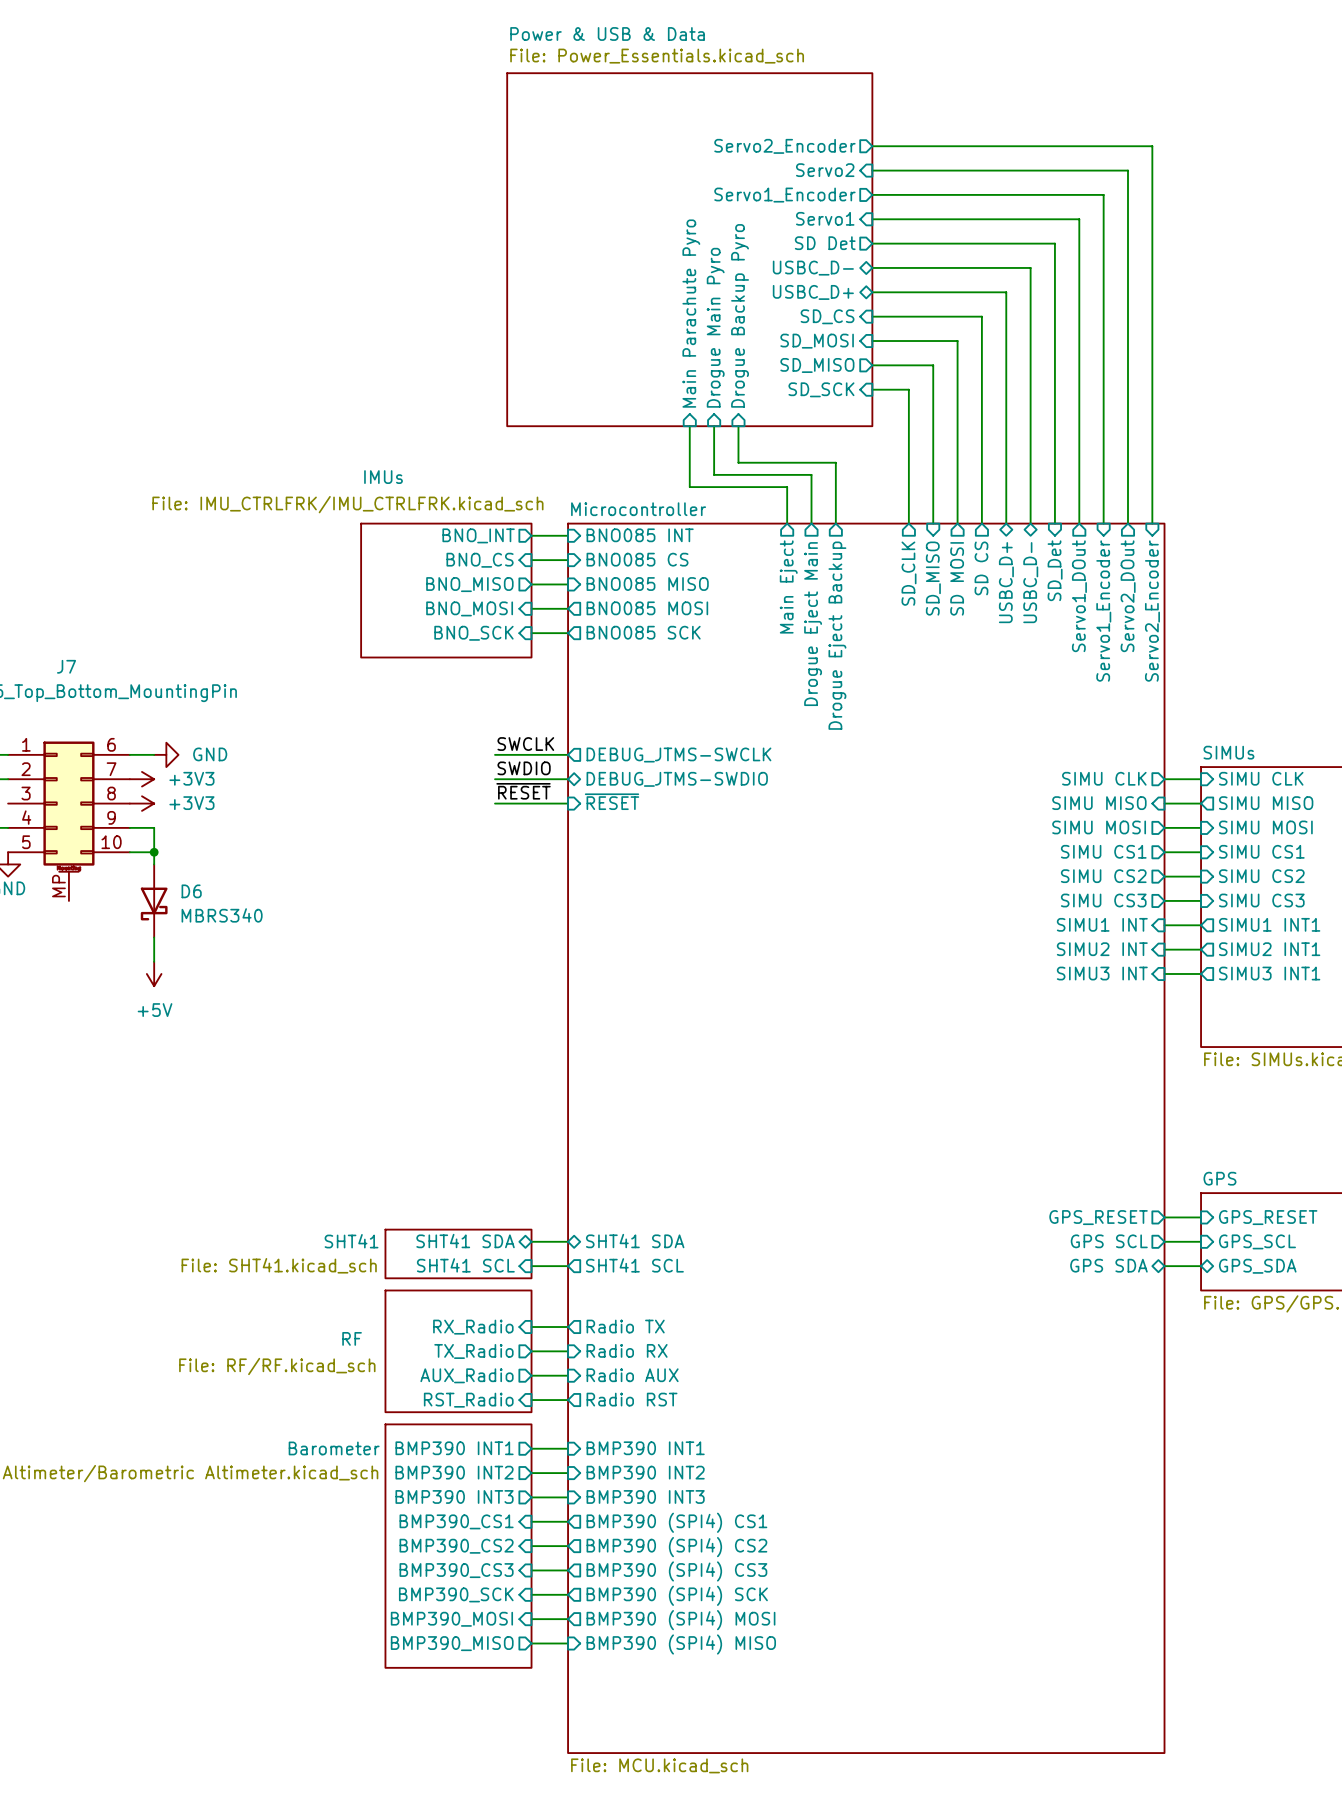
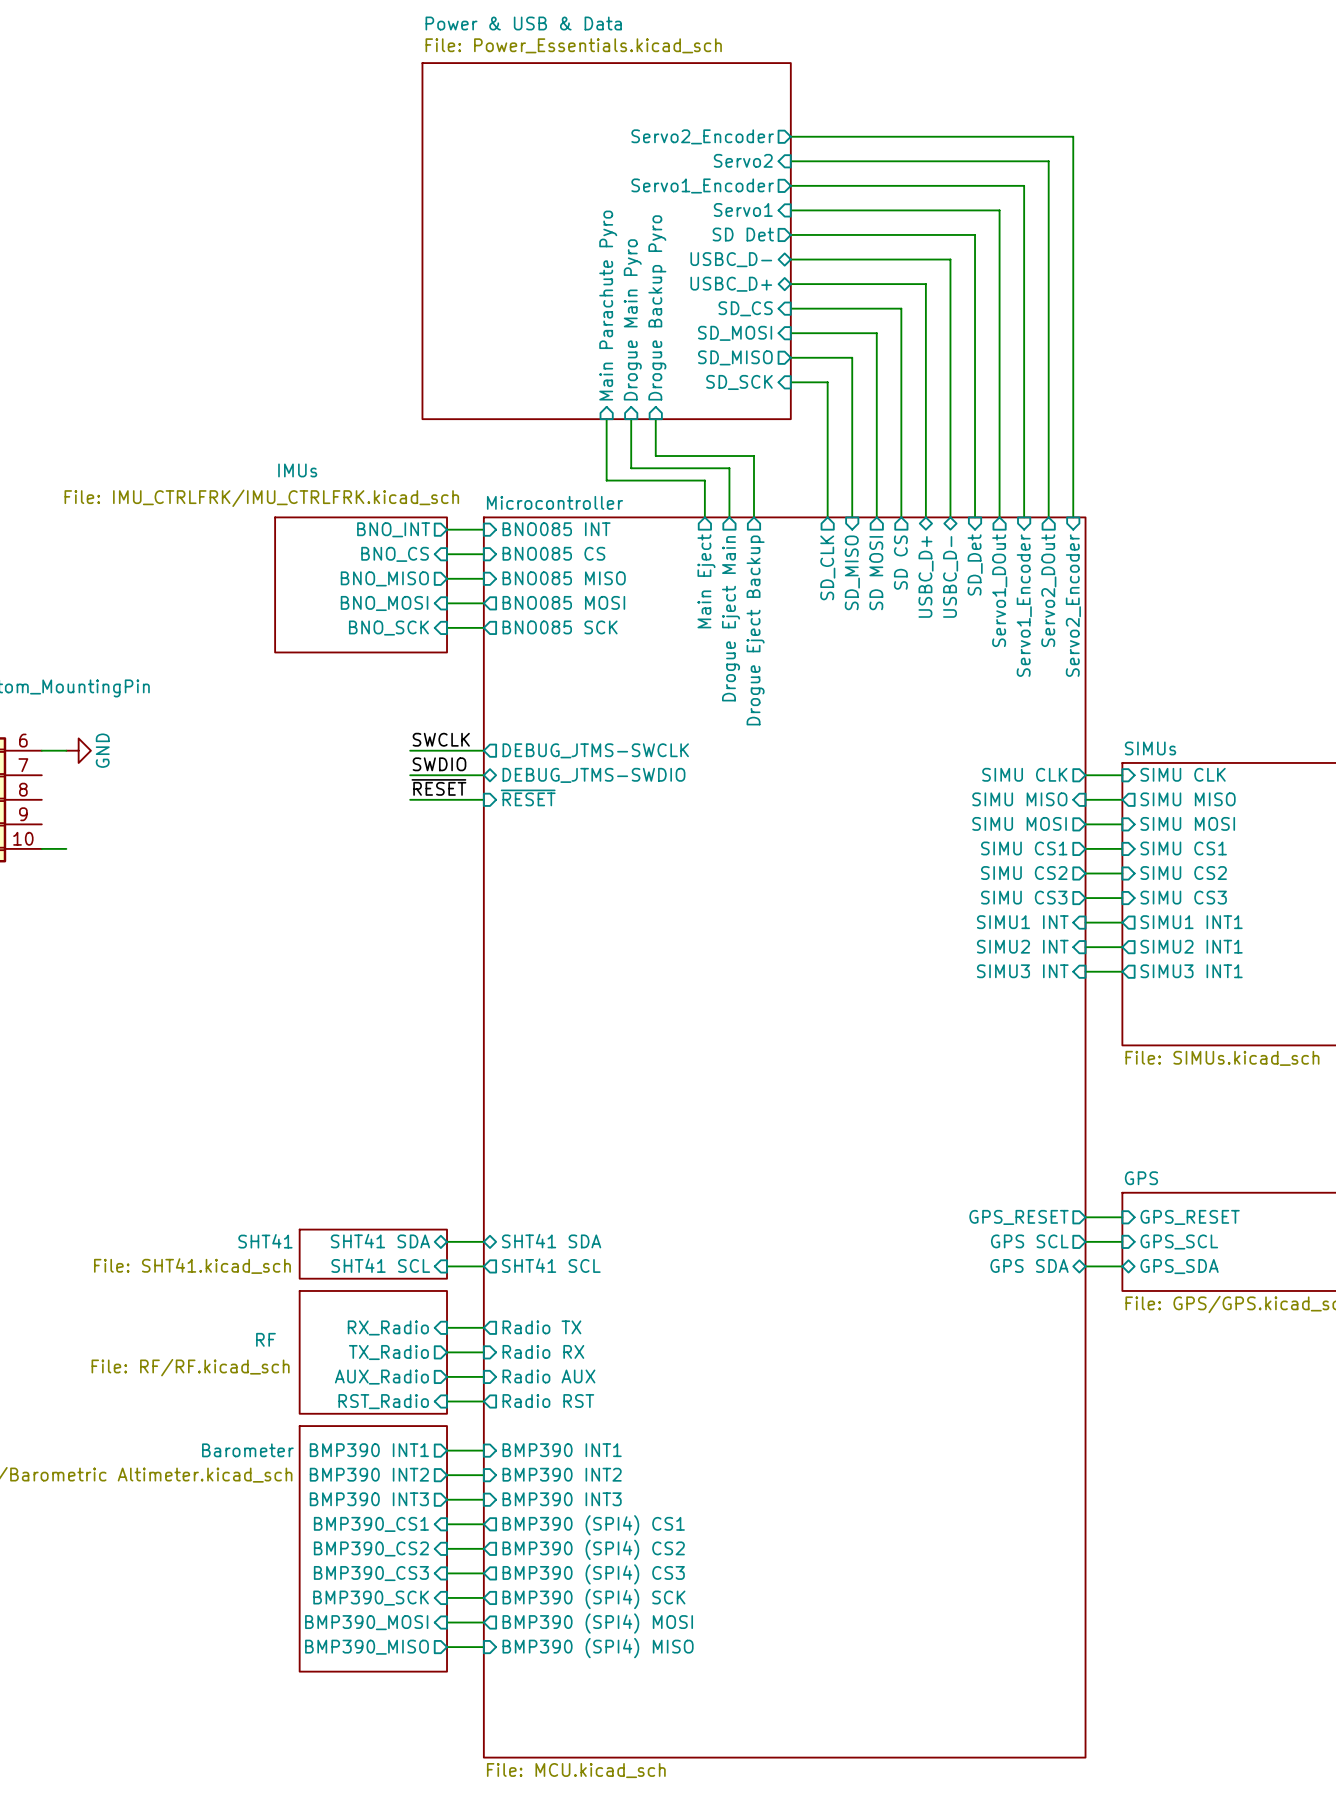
power symbol text rotation: 0° (210, 754) -> 90° counterclockwise (102, 750)
power symbol: +3V3 (142, 779) -> none
power symbol: +3V3 (142, 803) -> none
wire: (129, 827) (154, 827) (154, 864) -> none
junction: (154, 852) -> none
D6: MBRS340 (154, 900) -> none
wire: (154, 937) (154, 961) -> none
power symbol: +5V (154, 973) -> none

